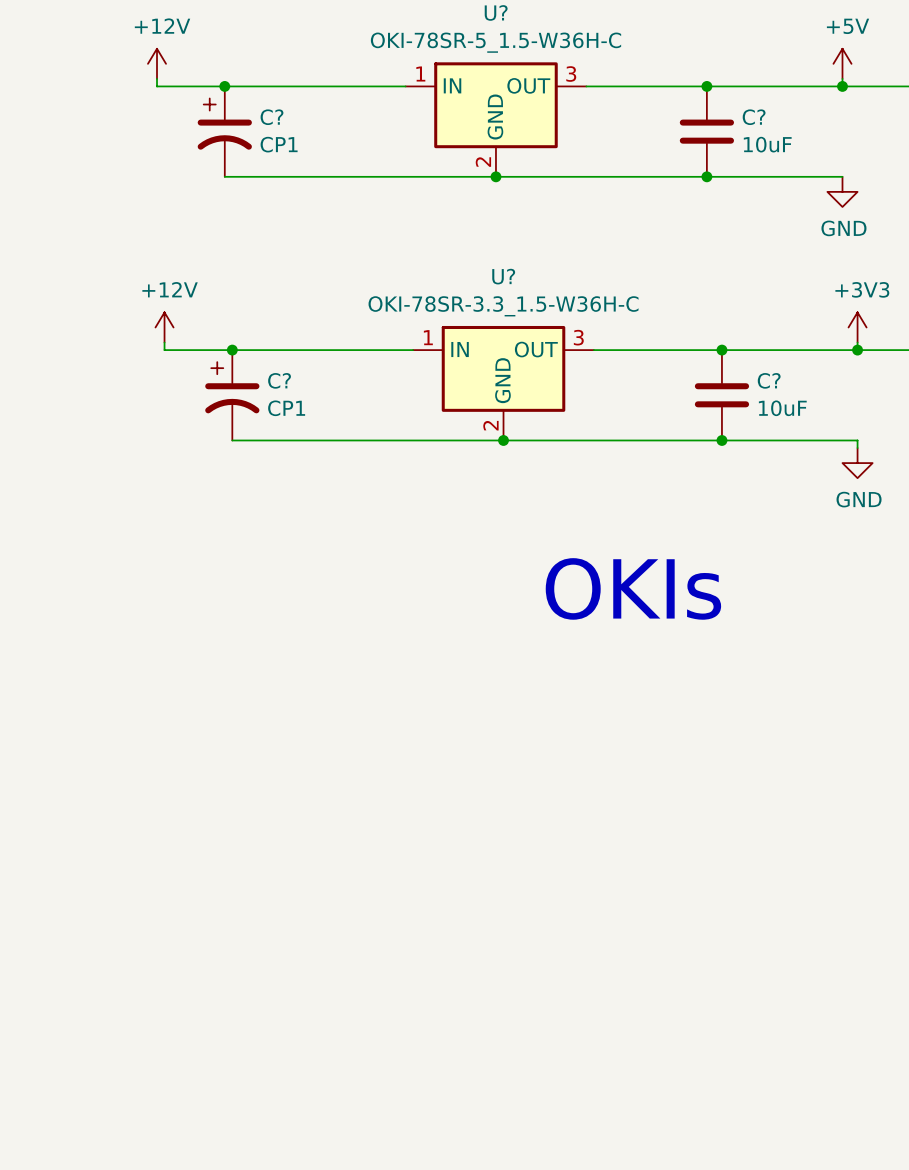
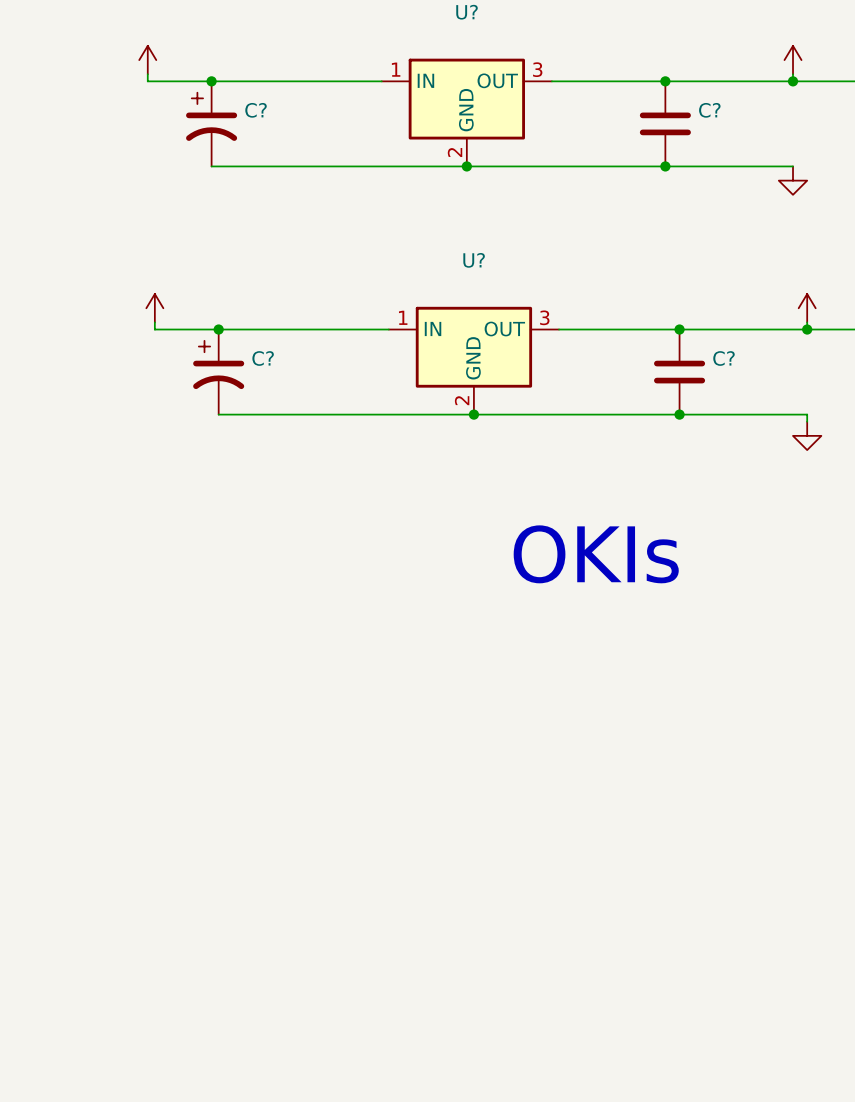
power symbol text: +12V (162, 26) -> none
power symbol text: +5V (848, 26) -> none
U? value: OKI-78SR-5_1.5-W36H-C (496, 42) -> none
C? value: CP1 (279, 144) -> none
C? value: 10uF (767, 144) -> none
power symbol text: GND (843, 228) -> none
power symbol text: +12V (170, 289) -> none
power symbol text: +3V3 (862, 289) -> none
U? value: OKI-78SR-3.3_1.5-W36H-C (503, 306) -> none
C? value: CP1 (286, 408) -> none
C? value: 10uF (782, 408) -> none
power symbol text: GND (859, 499) -> none

